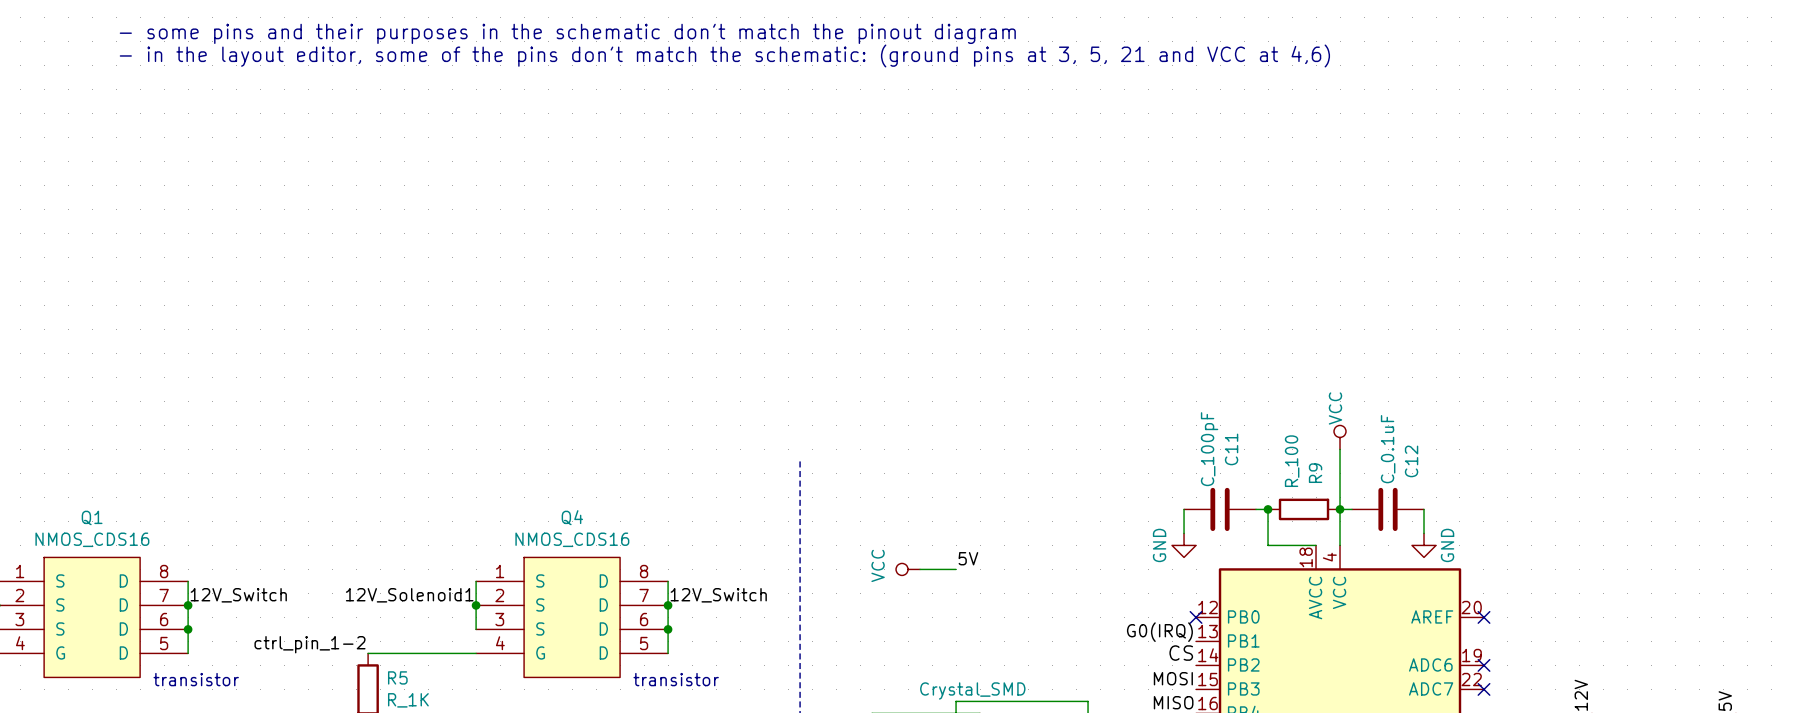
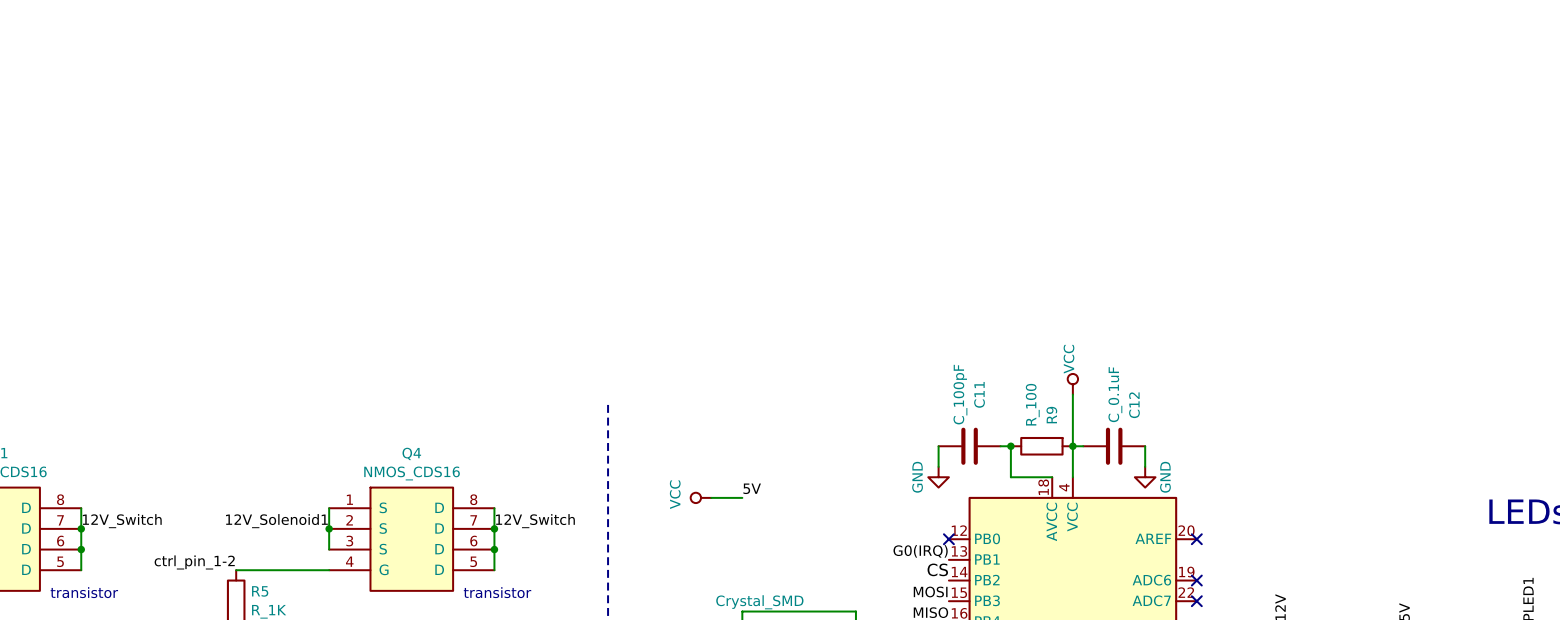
text: - some pins and their purposes in the schematic don't match the pinout diagram (567, 33) -> none
text: - in the layout editor, some of the pins don't match the schematic: (ground pins at 3, 5, 21 and VCC at 4,6) (724, 55) -> none

